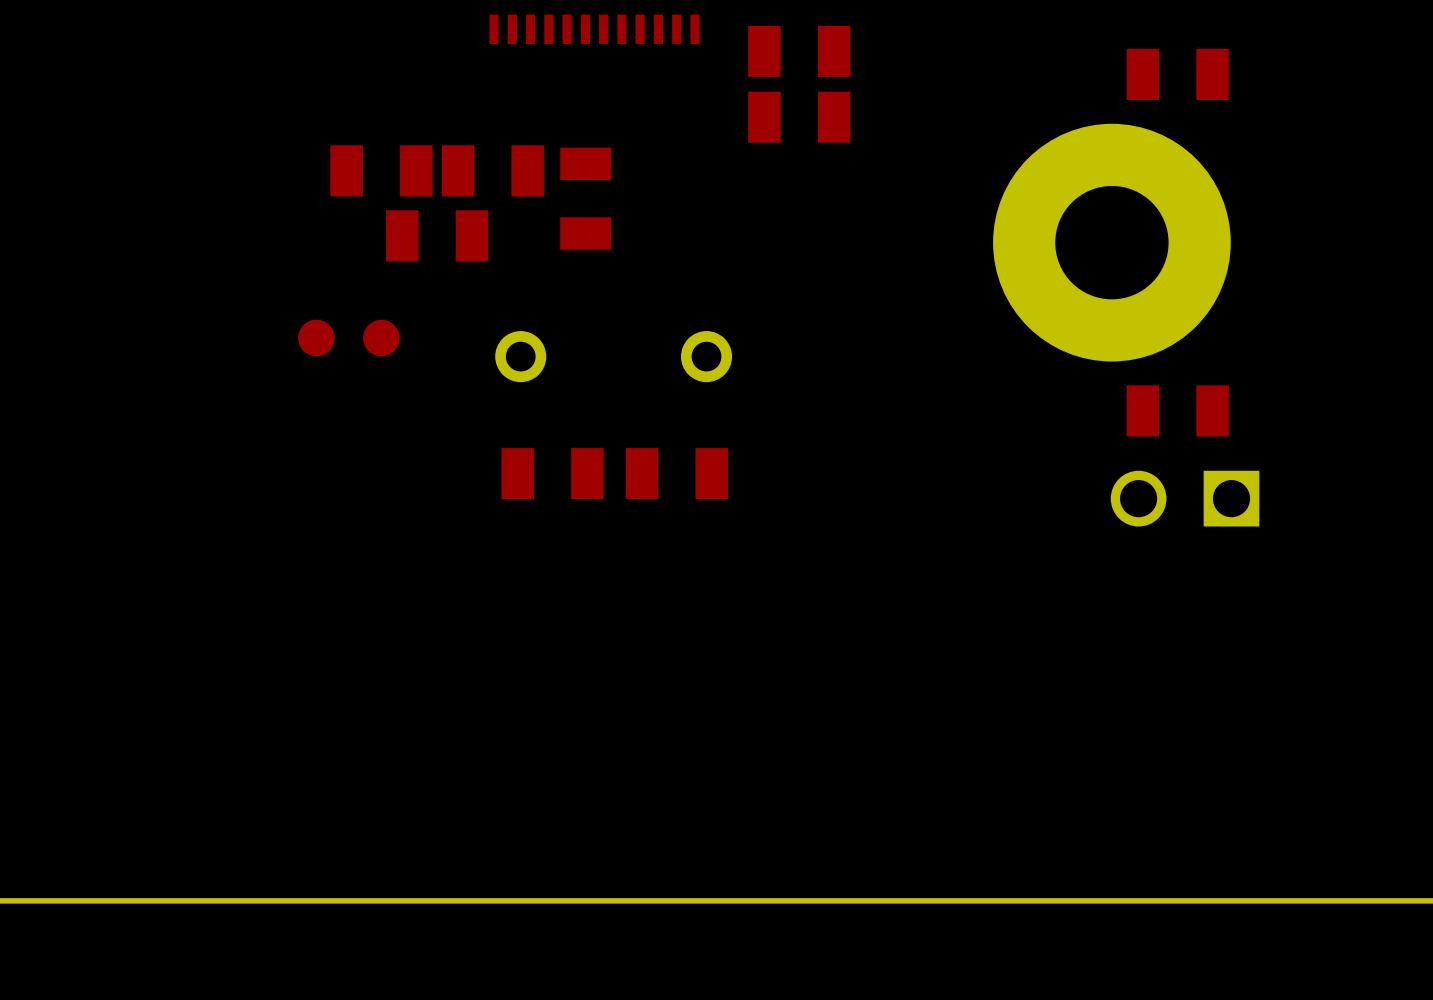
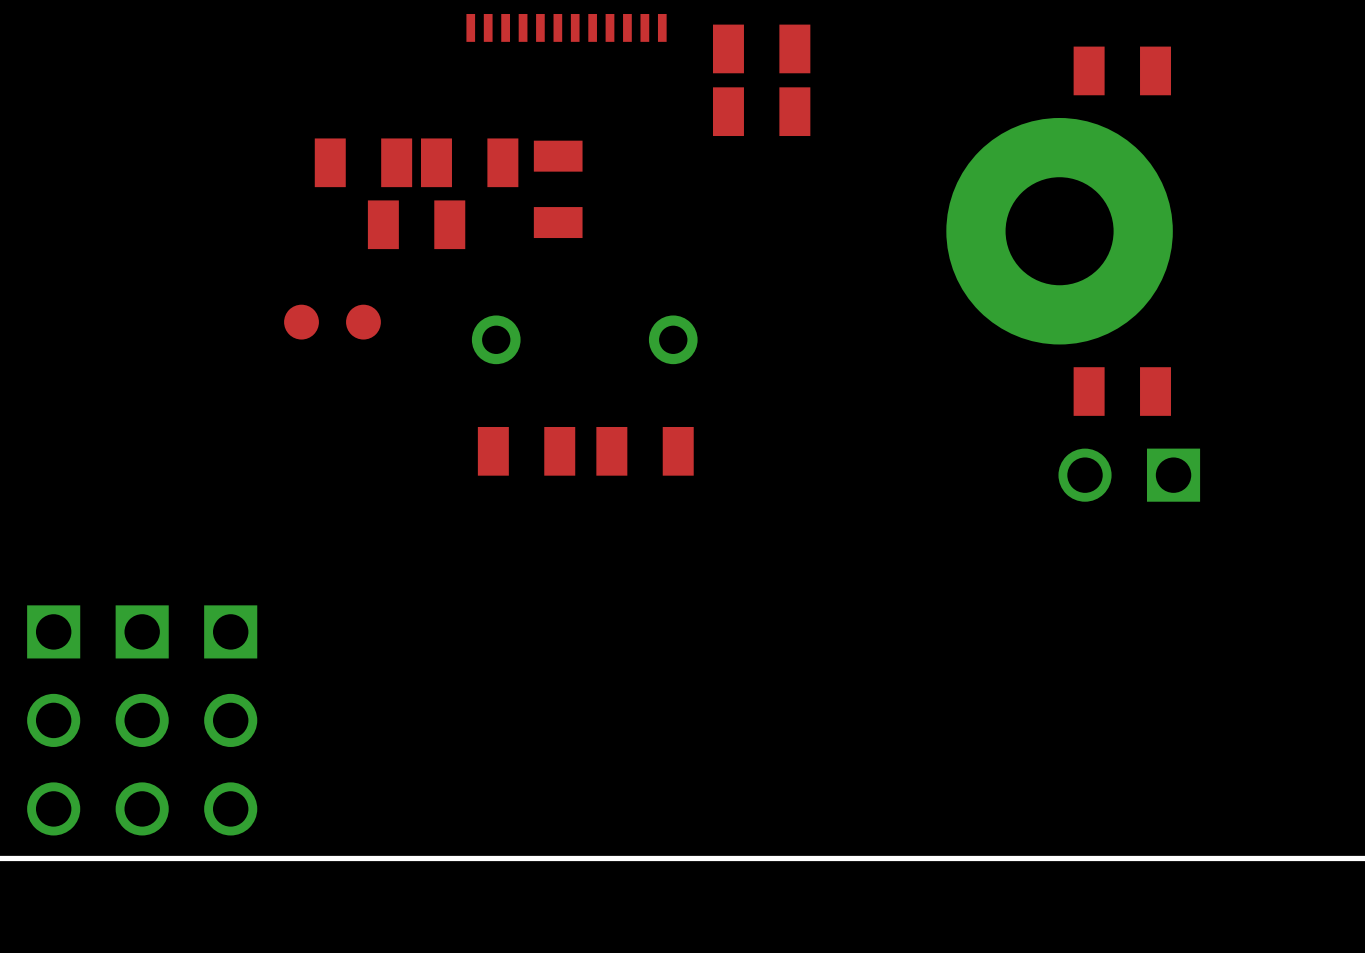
part: none -> (53, 720)
part: none -> (142, 720)
part: none -> (230, 720)

